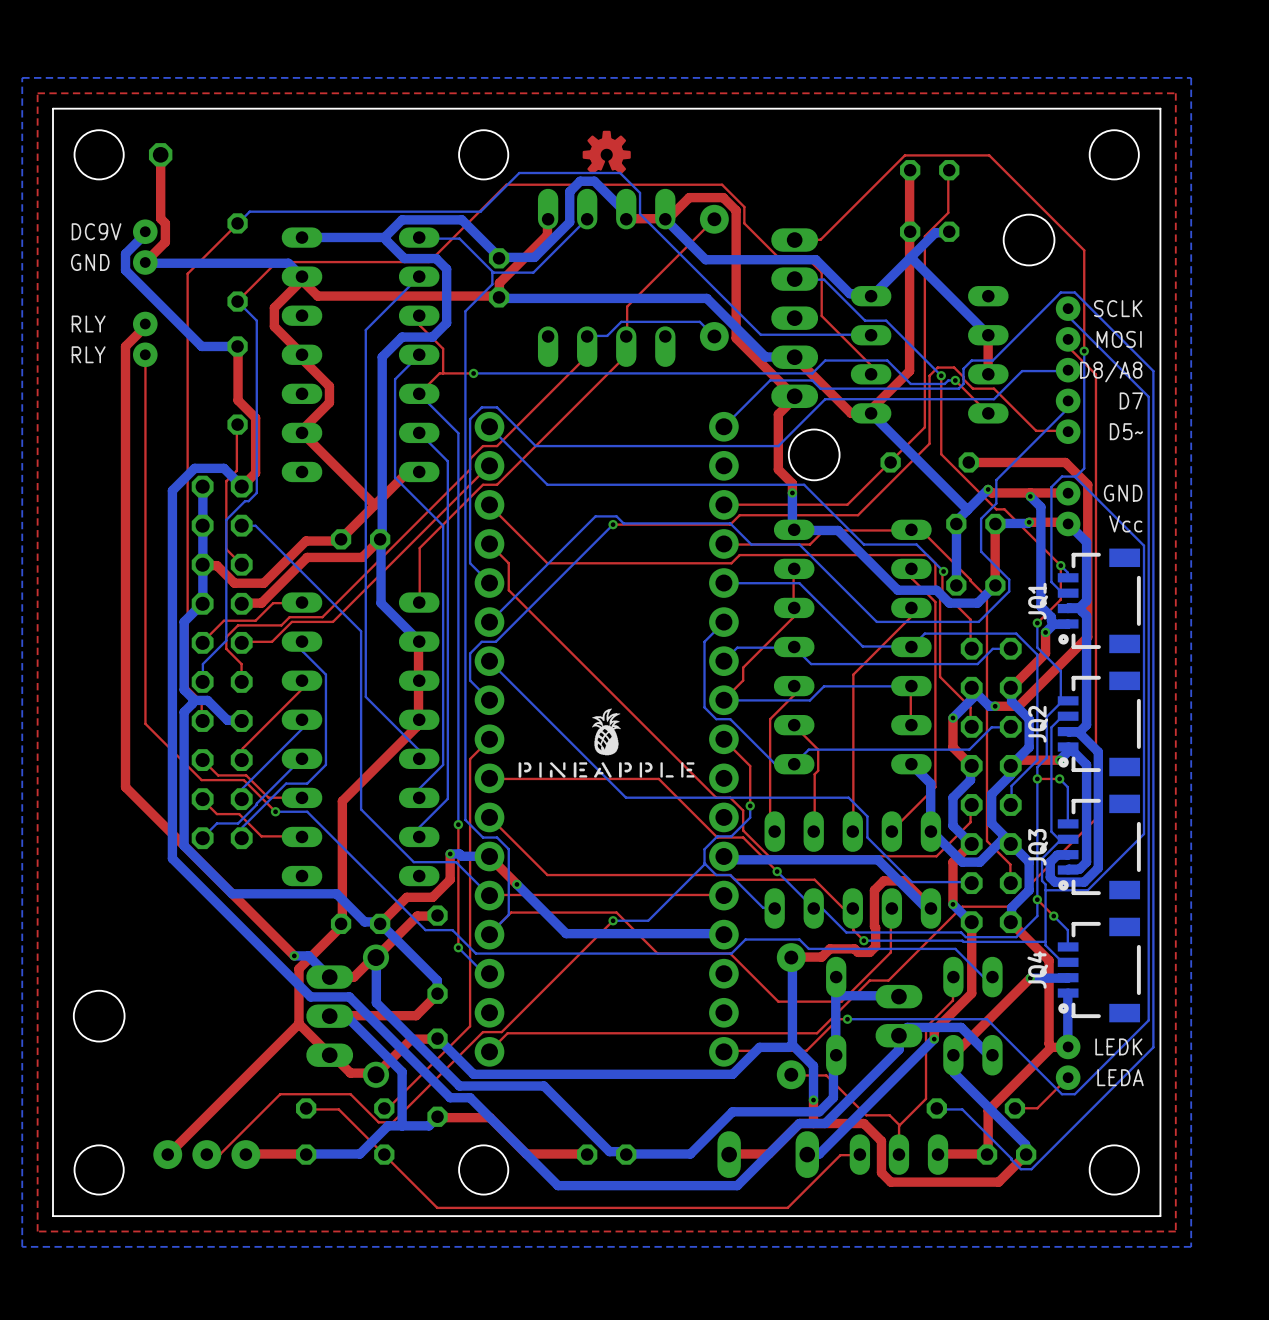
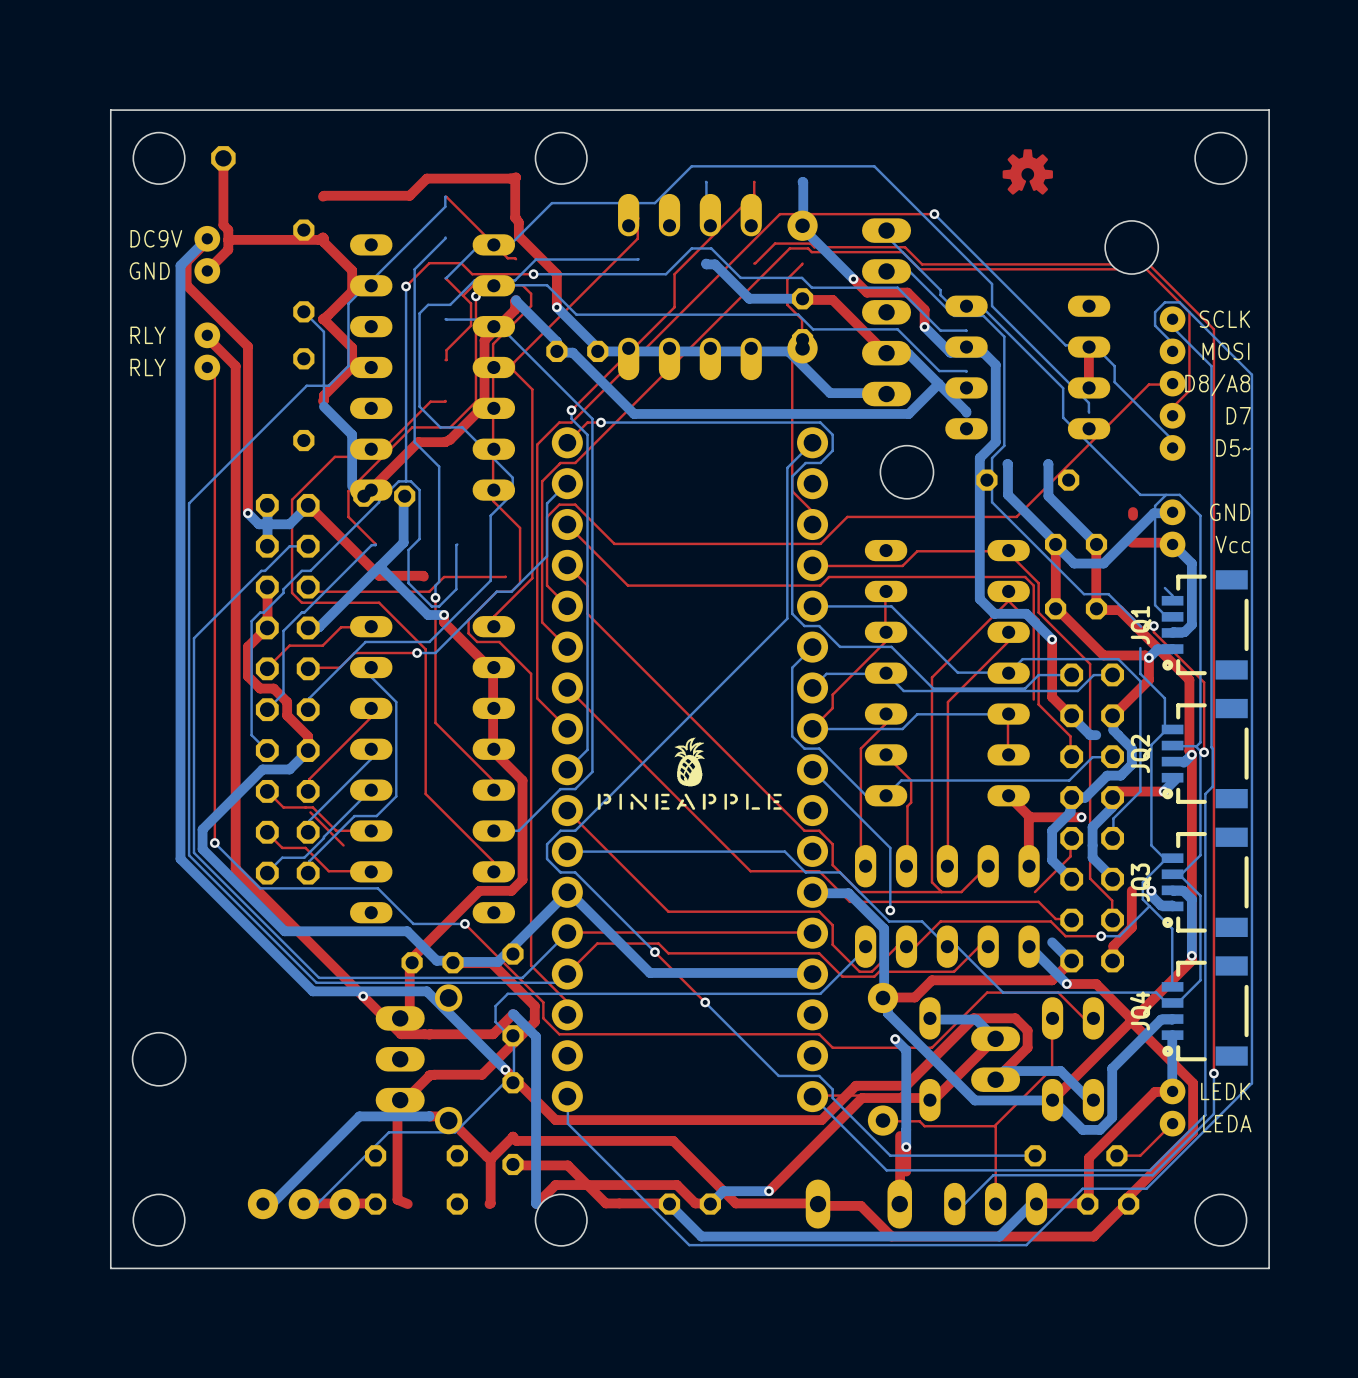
bottom zone outline: (1191, 77) (22, 77) (22, 1246) (1191, 1246) (1191, 77) -> none
top zone outline: (1175, 93) (37, 93) (37, 1231) (1175, 1231) (1175, 93) -> none
drawing position: (606, 152) -> (1027, 171)
top track: (910, 170) (909, 371) (872, 408) (871, 413) -> none
part: (929, 170) -> none
top track: (949, 170) (948, 212) (924, 236) (924, 427) (847, 504) (723, 504) -> (802, 263) (787, 279) (787, 304) (802, 319) (802, 339) (792, 350) (792, 491) (811, 510) (812, 524)
top track: none -> (754, 181) (754, 194) (674, 274) (674, 307) (571, 410)
bottom track: none -> (802, 181) (803, 228) (853, 279)
top track: none -> (322, 196) (409, 195) (426, 178) (516, 177) (515, 217) (518, 222) (518, 236) (556, 274) (556, 307)
top track: none -> (445, 196) (507, 258) (516, 259)
bottom track: none -> (445, 196) (445, 206) (348, 303) (348, 366) (328, 385) (306, 385) (189, 503) (189, 855) (316, 982) (558, 982) (567, 974)
top track: none -> (934, 214) (779, 214) (571, 422) (559, 422) (537, 444) (537, 698) (567, 728)
bottom track: none -> (934, 214) (1065, 345) (1093, 345) (1114, 366) (1114, 382) (1172, 439) (1172, 447)
via: none -> (934, 214)
bottom track: (622, 209) (594, 181) (580, 181) (569, 191) (569, 222) (534, 257) (499, 258) (461, 219) (402, 219) (384, 237) -> (706, 215) (706, 181)
top track: none -> (638, 218) (637, 238) (513, 362) (512, 370) (532, 389) (532, 578) (494, 616)
top track: (548, 219) (547, 235) (499, 283) (499, 297) (317, 296) (304, 283) (302, 276) (301, 280) (274, 307) (274, 326) -> (228, 239) (319, 239) (322, 237) (323, 242) (352, 270) (352, 291) (322, 319) (342, 337)
bottom track: (587, 219) (533, 272) (493, 272) (459, 238) (419, 237) -> none
top track: (626, 219) (665, 219) (689, 197) (723, 197) (736, 210) (736, 338) (794, 396) (778, 414) (778, 469) (792, 483) (792, 492) -> none
bottom track: (665, 219) (705, 259) (815, 259) (849, 293) (867, 293) (871, 296) (935, 232) (949, 231) -> none
top track: (714, 219) (627, 306) (625, 355) (497, 484) (481, 485) -> none
top track: (237, 223) (187, 273) (187, 687) (201, 701) (202, 720) -> none
bottom track: (237, 223) (249, 211) (480, 211) (519, 173) (620, 173) (640, 192) (640, 214) (760, 334) (871, 335) -> none
bottom track: none -> (886, 230) (886, 236) (940, 290) (940, 295) (956, 310) (985, 310) (1063, 388)
bottom track: none -> (445, 237) (414, 269) (414, 442) (439, 466) (439, 581) (435, 585) (435, 597)
top track: none -> (207, 238) (206, 242) (186, 261) (186, 285) (247, 346) (247, 513)
part: (929, 231) -> none
bottom track: (144, 232) (144, 235) (125, 253) (125, 270) (201, 346) (237, 346) -> (206, 239) (180, 265) (180, 858) (312, 991) (426, 991) (505, 1069)
bottom track: (384, 237) (302, 237) -> none
bottom track: (384, 237) (404, 258) (436, 258) (446, 269) (446, 323) (432, 337) (402, 337) (382, 357) (381, 603) (419, 641) -> none
top track: none -> (886, 247) (814, 247) (810, 243) (775, 243) (754, 263)
top track: (812, 239) (820, 239) (904, 155) (989, 155) (1084, 250) (1084, 301) -> (668, 369) (789, 248) (808, 248) (811, 252) (902, 252) (919, 269) (1146, 269) (1189, 312)
top track: none -> (905, 247) (922, 264) (1148, 264) (1213, 329) (1213, 1073)
bottom track: none -> (638, 259) (536, 259) (515, 280) (474, 280) (450, 304) (428, 304) (419, 313) (419, 406) (440, 427) (462, 427) (512, 477) (512, 493) (490, 515) (490, 580) (429, 641) (365, 641) (309, 698) (308, 709)
bottom track: none -> (706, 263) (715, 264) (749, 298) (802, 298)
bottom track: (910, 257) (988, 335) -> none
bottom track: (145, 262) (288, 263) (302, 276) -> none
bottom track: none -> (886, 271) (909, 271) (954, 315) (983, 315) (1004, 336) (1004, 445) (992, 458) (992, 502) (1084, 594) (1108, 594) (1141, 626)
top track: none -> (533, 274) (472, 274) (461, 263) (429, 263) (406, 286)
bottom track: none -> (533, 274) (665, 274) (691, 248) (711, 248) (740, 277) (802, 277) (811, 287) (897, 287) (940, 330) (966, 330)
via: none -> (533, 274)
top track: none -> (445, 278) (471, 303) (471, 325) (446, 350) (445, 360)
bottom track: none -> (445, 278) (479, 244) (510, 244) (551, 203) (654, 203) (691, 166) (874, 166) (992, 284) (992, 306) (1088, 402) (1089, 412)
top track: none -> (853, 279) (867, 292) (907, 292) (924, 309) (924, 326)
via: none -> (853, 279)
bottom track: (492, 272) (492, 284) (465, 311) (465, 819) (470, 824) -> (812, 442) (787, 467) (787, 618) (575, 830) (560, 830) (547, 844) (547, 858)
bottom track: (419, 276) (365, 330) (365, 696) (418, 749) (419, 758) -> none
bottom track: none -> (406, 286) (406, 481)
via: none -> (406, 286)
part rotation: 0° (499, 277) -> 90° clockwise (577, 351)
part position: (499, 277) -> (577, 351)
bottom track: (794, 279) (824, 279) (865, 320) (886, 320) (941, 375) -> none
top track: none -> (463, 295) (473, 285) (522, 285) (531, 293) (531, 306) (493, 344) (493, 501) (520, 527) (520, 583) (511, 591) (496, 591) (468, 619) (468, 633) (477, 641) (499, 641) (531, 673) (531, 965) (566, 1001) (567, 1014)
top track: none -> (475, 296) (475, 401) (450, 427) (412, 427) (348, 491) (348, 516) (375, 544)
bottom track: none -> (475, 296) (486, 285) (547, 285) (576, 314) (798, 314) (813, 329) (897, 329) (939, 371) (966, 371)
via: none -> (475, 296)
top track: none -> (802, 298) (832, 299) (886, 353)
top track: none -> (516, 300) (515, 309) (484, 340) (484, 405) (450, 439) (445, 442) (418, 442) (363, 496)
bottom track: none -> (516, 300) (556, 341) (556, 351) (572, 352) (634, 413) (908, 413) (938, 383)
bottom track: none -> (556, 307) (596, 346) (597, 351) (788, 351) (830, 393) (886, 394)
via: none -> (556, 307)
bottom track: (499, 297) (706, 298) (765, 357) (794, 357) -> none
top track: (237, 301) (276, 262) (429, 262) (506, 184) (722, 184) (744, 206) (744, 223) (777, 256) (805, 256) (821, 272) (821, 315) (870, 365) (871, 374) -> none
bottom track: (1051, 301) (992, 360) (971, 360) (963, 368) (963, 374) -> (1155, 312) (1155, 325) (1172, 342) (1172, 351)
part: none -> (802, 319)
top track: (419, 315) (419, 325) (443, 348) (443, 373) -> none
via: none -> (924, 326)
part position: (794, 318) -> (886, 312)
top track: (145, 324) (144, 327) (125, 346) (125, 787) (172, 834) -> (207, 335) (207, 337) (235, 366) (235, 868)
top track: (283, 335) (302, 354) (302, 359) (329, 386) (329, 402) (303, 428) (302, 432) (374, 505) -> (352, 347) (352, 367) (323, 395) (322, 400)
bottom track: (714, 336) (699, 321) (621, 321) (607, 335) (587, 336) -> none
top track: (1068, 339) (1069, 347) (1095, 374) (1095, 818) (1008, 906) (962, 906) (888, 980) (869, 980) (817, 1033) (507, 1033) (489, 1051) -> none
bottom track: none -> (886, 353) (908, 353) (966, 412)
top track: (237, 346) (238, 400) (255, 417) (255, 473) (241, 486) -> (423, 576) (379, 575) (308, 505)
top track: none -> (1189, 363) (1189, 390) (1173, 406) (1172, 415)
bottom track: (1084, 351) (1084, 468) (1075, 477) -> none
via: (1084, 351) -> none
bottom track: (1105, 353) (1148, 396) (1148, 1020) (1099, 1069) -> (1211, 366) (1212, 786) (1205, 793) (1205, 1115)
bottom track: (419, 354) (395, 379) (395, 477) (443, 525) (443, 764) (419, 788) (419, 797) -> (445, 319) (493, 319) (592, 418) (592, 771) (575, 789) (560, 789) (518, 830) (494, 830)
top track: (145, 355) (145, 723) (201, 780) (243, 780) -> (207, 368) (214, 375) (214, 843)
top track: (794, 357) (851, 413) (870, 413) -> none
bottom track: (1144, 361) (1153, 371) (1153, 1047) (1031, 1169) (1020, 1169) (962, 1109) (936, 1108) -> (705, 1002) (778, 1075) (819, 1075) (832, 1089) (832, 1098) (890, 1155) (1034, 1155)
bottom track: (1068, 370) (1022, 371) (994, 399) (825, 399) (778, 446) (731, 446) -> (600, 422) (820, 422) (832, 434) (832, 450) (820, 463)
top track: (473, 373) (439, 373) (419, 393) -> none
bottom track: (473, 373) (812, 373) (825, 360) (887, 360) (910, 383) (944, 383) (948, 380) (955, 380) -> none
via: (473, 373) -> none
top track: (941, 375) (941, 454) (996, 509) (1004, 509) (1060, 565) (1060, 599) (1037, 623) -> none
via: (941, 375) -> none
top track: (955, 380) (988, 413) -> none
via: (955, 380) -> none
bottom track: (963, 383) (958, 388) (820, 388) (812, 380) (770, 380) (723, 426) -> (1063, 398) (1063, 417) (1140, 494) (1166, 494)
bottom track: (256, 392) (256, 492) (248, 501) (245, 501) (226, 519) (226, 640) (202, 664) (202, 681) -> (375, 544) (371, 545) (283, 630) (283, 693) (267, 709)
bottom track: none -> (323, 406) (352, 434) (352, 486)
bottom track: (419, 393) (458, 433) (458, 824) -> none
bottom track: none -> (571, 410) (571, 418) (575, 422)
via: none -> (571, 410)
bottom track: (1068, 400) (1067, 408) (996, 480) (996, 503) (981, 518) (981, 551) (1009, 579) (1009, 591) (978, 621) (876, 621) (799, 544) (751, 544) (730, 523) (623, 523) (616, 516) (595, 516) (489, 622) -> none
bottom track: (497, 407) (481, 407) (470, 419) (470, 484) -> (567, 483) (547, 503)
top track: none -> (600, 422) (587, 422) (567, 442)
via: none -> (600, 422)
bottom track: (871, 413) (967, 509) -> none
bottom track: (508, 419) (535, 446) (717, 446) -> (587, 434) (587, 749) (567, 769)
top track: (237, 424) (236, 470) -> (445, 400) (430, 401) (375, 456) (334, 456) (303, 488)
bottom track: (489, 426) (547, 484) (804, 484) (863, 544) (916, 544) (943, 571) -> none
top track: (1068, 431) (1036, 430) (994, 388) (972, 388) (954, 367) (937, 367) (929, 375) (929, 443) (858, 515) (739, 515) -> (1172, 383) (1148, 384) (1016, 516) (847, 516) (829, 535)
bottom track: (419, 432) (447, 461) (447, 798) (419, 826) (419, 836) -> none
bottom track: none -> (805, 463) (792, 476) (792, 613) (804, 626) (819, 626) (840, 646) (891, 646) (933, 688) (1025, 688) (1038, 675) (1071, 674)
top track: (470, 458) (470, 469) (322, 617) (289, 617) (281, 625) (238, 625) (226, 637) (226, 648) (241, 664) (241, 681) -> (547, 476) (542, 481) (542, 622) (567, 647)
top track: (968, 462) (1065, 462) (1087, 484) (1087, 637) (1018, 706) (995, 706) -> none
top track: (489, 465) (332, 621) (291, 621) (286, 627) -> (417, 653) (354, 653)
top track: (419, 471) (406, 473) (341, 539) (306, 541) (263, 583) (234, 583) (216, 565) (202, 565) -> (308, 750) (308, 736) (287, 715) (287, 702) (273, 688) (260, 688) (247, 676) (247, 646) (267, 627) (267, 588)
bottom track: none -> (404, 496) (403, 542) (319, 627) (308, 627)
bottom track: (241, 486) (223, 468) (194, 468) (172, 490) (172, 858) -> (308, 546) (289, 546) (265, 570) (261, 570) (193, 638) (193, 852) (235, 894)
bottom track: none -> (308, 505) (289, 524) (258, 524) (247, 513)
top track: (988, 489) (991, 492) (1068, 493) -> none
bottom track: (988, 489) (957, 519) (956, 523) -> (1007, 464) (1007, 494) (1055, 544)
via: (988, 489) -> none
bottom track: (792, 492) (792, 525) (794, 530) (838, 530) (883, 576) -> (924, 326) (950, 352) (983, 352) (995, 364) (995, 442) (979, 458) (979, 599)
via: (792, 492) -> none
via: none -> (247, 513)
bottom track: (1030, 496) (1040, 507) (1040, 606) (1051, 617) (1053, 624) -> none
via: (1030, 496) -> none
bottom track: (1094, 496) (1144, 545) -> (1251, 374) (1251, 567)
bottom track: none -> (1200, 515) (1200, 742) (1196, 746)
top track: (470, 497) (419, 548) (419, 592) -> (547, 516) (547, 585) (567, 606)
bottom track: (1029, 522) (995, 523) -> (1048, 464) (1048, 496) (1096, 544)
via: (1029, 522) -> none
bottom track: none -> (457, 544) (456, 589) (439, 606) (431, 606) (408, 583) (408, 550) (419, 539) (419, 489) (410, 481) (398, 481) (310, 570) (301, 570) (283, 589) (283, 592) (263, 612) (260, 612) (251, 621) (251, 735) (267, 750)
top track: (731, 523) (613, 524) -> (820, 543) (614, 543) (575, 504) (559, 504)
top track: none -> (1055, 544) (1055, 608) (1103, 655) (1145, 655) (1148, 657)
bottom track: (613, 524) (495, 641) (481, 641) (470, 653) (470, 680) (489, 700) -> none
via: (613, 524) -> none
bottom track: (956, 524) (956, 585) -> (1055, 545) (1074, 563) (1103, 563) (1153, 513) (1172, 512)
bottom track: (202, 525) (202, 603) (184, 621) (184, 689) (194, 700) -> none
bottom track: (241, 525) (255, 525) (361, 631) (361, 809) (413, 862) (456, 862) (489, 895) -> none
top track: (911, 529) (921, 530) (986, 597) (986, 841) (989, 843) -> (1070, 644) (1090, 664) (1090, 878)
bottom track: (470, 535) (470, 563) (489, 583) -> (547, 556) (511, 591) (496, 591) (435, 653) (417, 653)
part position: (360, 539) -> (384, 496)
top track: (380, 539) (362, 557) (307, 557) (261, 603) (241, 603) -> none
bottom track: none -> (379, 566) (428, 615) (444, 615)
top track: (226, 549) (241, 564) -> (505, 576) (444, 577) (429, 591) (312, 591) (308, 587)
top track: none -> (292, 570) (292, 592) (301, 602) (379, 602) (425, 649) (425, 793) (493, 861) (493, 871)
via: (1060, 565) -> none
top track: none -> (1008, 591) (1007, 601) (931, 677) (931, 882) (941, 892)
top track: (943, 571) (942, 591) -> (1008, 550) (1007, 552) (1038, 583) (1038, 612) (1041, 615)
via: (943, 571) -> none
top track: none -> (435, 597) (435, 722) (493, 780) (493, 790)
via: none -> (435, 597)
top track: none -> (1096, 608) (1119, 610) (1189, 679) (1189, 751) (1191, 754) (1191, 960) (1133, 1019)
bottom track: (995, 585) (977, 603) (949, 603) (936, 590) (928, 590) -> (1052, 639) (1026, 613)
top track: none -> (444, 615) (444, 622) (488, 666) (493, 667)
via: none -> (444, 615)
top track: none -> (1153, 626) (1153, 632) (1204, 682) (1204, 752)
via: none -> (1153, 626)
bottom track: (1079, 607) (1086, 616) (1086, 725) -> none
top track: none -> (1052, 639) (1052, 697) (1071, 715)
via: none -> (1052, 639)
top track: (970, 619) (971, 648) -> none
via: (1037, 623) -> none
via: none -> (417, 653)
top track: none -> (567, 687) (750, 871) (819, 871) (849, 901) (1038, 901) (1055, 919) (1071, 920)
bottom track: (489, 661) (625, 797) (848, 797) (867, 816) (867, 837) (911, 882) (971, 883) -> none
top track: (935, 672) (935, 787) (891, 831) -> none
bottom track: (971, 687) (974, 696) (952, 718) -> none
bottom track: (194, 700) (184, 712) (184, 845) (232, 893) -> (308, 750) (289, 769) (262, 769) (202, 829) (202, 849) (284, 931) (298, 931)
bottom track: (194, 700) (207, 700) (227, 720) (241, 720) -> none
via: (995, 706) -> none
bottom track: (1047, 715) (1046, 757) (1037, 767) (1037, 916) (1016, 937) (965, 937) (961, 932) (846, 932) (822, 909) (813, 908) (777, 871) -> none
bottom track: (1068, 716) (1061, 716) (1051, 727) (1051, 831) (1059, 839) (1068, 839) (1060, 839) (1042, 858) (1042, 880) (1045, 884) (1045, 945) (1052, 952) -> (1172, 745) (1195, 746) (1200, 751) (1200, 855) (1180, 874) (1172, 874) (1179, 874) (1200, 895) (1200, 980) (1178, 1002) (1172, 1002)
top track: (952, 718) (952, 747) (971, 765) -> none
via: (952, 718) -> none
top track: (419, 719) (417, 726) (342, 801) (342, 919) (340, 927) (298, 968) (298, 1023) -> (493, 749) (495, 753) (522, 780) (522, 879) (511, 890) (479, 890) (412, 958) (409, 966) (409, 1013)
via: none -> (1204, 752)
via: none -> (1191, 754)
bottom track: (1068, 731) (1078, 732) (1098, 751) (1098, 868) (1084, 882) (1054, 882) (1050, 877) (1050, 862) (1057, 855) (1068, 854) -> (1191, 955) (1191, 899) (1183, 890) (1172, 890)
bottom track: (1029, 734) (1029, 747) (1010, 765) -> (1131, 764) (1120, 775) (1107, 775) (1085, 797) (1071, 797)
top track: (489, 739) (470, 759) (470, 1026) (388, 1108) (384, 1108) -> none
top track: (723, 739) (750, 766) (750, 805) -> none
bottom track: none -> (812, 769) (890, 847) (890, 910)
bottom track: (1068, 746) (1086, 764) (1086, 862) (1079, 869) (1068, 870) -> (1151, 890) (1151, 895) (1161, 905) (1172, 906)
top track: none -> (1008, 795) (1028, 816) (1029, 866)
bottom track: (911, 764) (930, 783) (930, 831) (962, 862) (979, 862) (1002, 839) (1011, 844) (1029, 862) (1029, 890) (1011, 907) (1010, 922) -> none
top track: (490, 778) (658, 778) (717, 837) (743, 837) (777, 871) -> none
via: (1037, 778) -> none
top track: (1059, 778) (1037, 778) -> none
bottom track: (1059, 778) (1067, 787) (1068, 823) -> none
via: (1059, 778) -> none
top track: none -> (1081, 817) (1028, 817)
via: none -> (1081, 817)
bottom track: (750, 805) (750, 817) (731, 836) (717, 836) (704, 849) (704, 863) (716, 875) (730, 875) (763, 907) (774, 908) -> (835, 979) (865, 946)
via: (750, 805) -> none
bottom track: none -> (214, 843) (260, 888) (377, 888) (413, 923) (464, 923)
via: none -> (214, 843)
bottom track: (275, 811) (307, 811) (425, 930) (452, 930) (475, 953) -> (303, 1204) (317, 1203) (388, 1132) (455, 1132) (513, 1073) (513, 1040) (495, 1022) (495, 1006) (507, 993) (553, 993)
via: (275, 811) -> none
top track: (489, 817) (547, 875) (586, 875) -> (567, 811) (668, 911)
bottom track: none -> (567, 851) (784, 851) (805, 872) (840, 872) (889, 921) (922, 921) (947, 947) (957, 947) (1003, 992) (1156, 992)
top track: (458, 824) (458, 947) -> none
via: (458, 824) -> none
bottom track: (1144, 834) (1087, 890) (1045, 890) -> (1251, 868) (1251, 1083) (1146, 1188) (1082, 1188) (1026, 1245) (689, 1245) (567, 1123) (567, 1096)
top track: (971, 844) (952, 862) (952, 904) -> none
bottom track: (508, 849) (508, 914) (489, 934) -> (587, 884) (654, 952)
top track: (450, 853) (450, 879) (432, 897) (406, 897) (380, 923) -> (407, 1204) (397, 1199) (397, 1107) (429, 1075) (482, 1074) (534, 1022) (534, 1006) (491, 963) (452, 962)
bottom track: (450, 853) (459, 853) (461, 856) (489, 856) -> none
via: (450, 853) -> none
via: none -> (1151, 890)
top track: (489, 856) (516, 884) -> none
top track: (936, 856) (866, 856) -> (988, 866) (961, 892)
bottom track: (724, 857) (726, 859) (877, 859) (926, 907) (930, 908) -> (813, 893) (848, 893) (884, 928) (883, 997) (887, 1001) (887, 1013) (974, 1100) (1052, 1100)
bottom track width: thick (172, 858) (252, 938) -> thin (235, 894) (319, 977)
bottom track: (705, 863) (648, 920) (613, 920) -> none
bottom track: none -> (1149, 906) (1119, 936) (1101, 936)
via position: (777, 871) -> (890, 910)
top track: (734, 879) (814, 879) (842, 907) (853, 909) (853, 930) (863, 940) -> (824, 916) (832, 925) (832, 944) (859, 971) (871, 971) (896, 947) (916, 946) (940, 921) (1050, 921) (1065, 936) (1101, 936)
bottom track: (516, 884) (566, 933) (568, 933) -> (452, 962) (498, 961) (567, 892) (650, 972)
via: (516, 884) -> none
top track: none -> (464, 923) (543, 1002) (543, 1018) (559, 1034) (819, 1034) (832, 1047) (931, 1047) (935, 1044)
via: none -> (464, 923)
via: none -> (1101, 936)
top track: (1037, 899) (1053, 916) -> none
via: (1037, 899) -> none
via: (952, 904) -> none
top track: (930, 908) (903, 880) (883, 880) (874, 890) (875, 946) (869, 952) (858, 952) (854, 948) (829, 948) -> (1071, 960) (1052, 980) (931, 980) (923, 988)
bottom track: none -> (1029, 946) (1066, 984)
top track: (890, 909) (890, 952) -> (1093, 1018) (1084, 1018) (1058, 992) (987, 992)
top track: (511, 912) (616, 912) (657, 953) (730, 953) (778, 1001) (841, 1001) -> (589, 950) (597, 943) (658, 943) (668, 953) (819, 953) (842, 976) (874, 976) (879, 971) (954, 971) (978, 947) (987, 947)
top track: none -> (654, 952) (705, 1002)
via: none -> (654, 952)
top track: (437, 915) (417, 916) (354, 977) (329, 977) -> none
bottom track: (1053, 916) (1067, 930) -> (1151, 744) (1151, 845) (1164, 858) (1172, 858) (1166, 858) (1142, 882) (1142, 899) (1172, 928) (1172, 969)
via: (1053, 916) -> none
via: none -> (1191, 955)
top track: (613, 920) (501, 1032) (482, 1032) (392, 1122) (378, 1122) (350, 1094) (280, 1094) (220, 1153) (206, 1154) -> none
via: (613, 920) -> none
top track: (971, 922) (971, 993) (934, 1030) (934, 1039) -> none
top track: (1010, 922) (1049, 960) (1049, 1043) (1051, 1047) -> (1112, 960) (1113, 946) (1131, 927) (1131, 890)
bottom track: (380, 923) (437, 980) (437, 993) -> none
bottom track: (252, 938) (310, 996) (349, 996) (450, 1097) (470, 1097) (558, 1185) (617, 1185) -> (319, 977) (522, 977) (567, 933)
bottom track: (745, 939) (799, 939) (808, 948) (955, 948) (983, 977) (992, 977) -> none
bottom track: (863, 940) (1045, 941) -> none
via: (863, 940) -> none
top track: none -> (1066, 984) (1096, 984) (1132, 1020)
via: none -> (1066, 984)
bottom track: (458, 947) (484, 973) (489, 973) -> none
via: (458, 947) -> none
top track: none -> (363, 996) (401, 1034) (493, 1034) (512, 1014)
bottom track: (294, 955) (308, 955) (329, 977) -> none
bottom track: (376, 957) (376, 1002) (459, 1086) (543, 1086) (609, 1151) (622, 1151) (626, 1154) -> none
bottom track: (791, 957) (792, 1044) -> none
via: none -> (705, 1002)
bottom track: none -> (512, 1014) (536, 1036) (536, 1204)
bottom track: none -> (929, 1018) (976, 1019) (994, 1037)
via: (1030, 978) -> none
bottom track: (1057, 978) (1030, 978) -> (1161, 1019) (1112, 1068) (1112, 1117) (1099, 1129) (1082, 1129) (1053, 1100)
top track: none -> (1131, 1021) (1193, 1083) (1193, 1132) (1129, 1196) (1129, 1203) (1124, 1205) (1093, 1236) (891, 1236) (860, 1205) (822, 1205) (817, 1203) (735, 1203) (673, 1140) (516, 1140) (512, 1136) (490, 1159)
top track: (437, 993) (416, 1015) (329, 1016) -> none
bottom track: (897, 995) (839, 995) (836, 977) (836, 1055) (833, 1059) (833, 1097) (819, 1111) (732, 1111) (690, 1153) (627, 1153) -> (768, 1191) (723, 1191) (711, 1203)
via: none -> (895, 1039)
top track: none -> (995, 1038) (934, 1099) (862, 1098) (768, 1191)
top track: (952, 1000) (926, 1027) (926, 1098) (899, 1125) -> (1052, 1042) (1052, 1068) (995, 1124) (995, 1174)
bottom track: (329, 1016) (347, 1016) (402, 1071) (402, 1125) -> none
bottom track: (847, 1019) (986, 1019) (1061, 1094) (1074, 1094) -> (812, 1096) (886, 1170) (1150, 1170) (1179, 1140)
via: (847, 1019) -> none
top track: (298, 1023) (350, 1073) (376, 1074) (411, 1039) (437, 1038) -> none
top track: (298, 1023) (167, 1154) -> none
top track: none -> (505, 1069) (555, 1120) (821, 1120) (855, 1085) (906, 1085) (973, 1018) (1015, 1018) (1027, 1030) (1027, 1047) (995, 1079)
via: none -> (505, 1069)
bottom track: none -> (1213, 1073) (1213, 1113) (1152, 1175) (993, 1175) (965, 1203) (954, 1204)
via: none -> (1213, 1073)
bottom track: (898, 1035) (899, 1049) (825, 1123) (799, 1123) (737, 1185) -> (1036, 1204) (1031, 1204) (999, 1236) (826, 1236)
bottom track: (437, 1038) (473, 1074) (732, 1074) (759, 1047) (788, 1047) (792, 1044) -> none
bottom track: (934, 1039) (819, 1153) (807, 1154) -> none
via: (934, 1039) -> none
bottom track: (792, 1044) (813, 1066) -> (895, 1039) (906, 1050) (906, 1111)
bottom track: (954, 1055) (954, 1073) (1025, 1144) (1026, 1154) -> none
top track: none -> (429, 1116) (446, 1116) (490, 1159)
bottom track: none -> (429, 1116) (359, 1116) (272, 1203) (262, 1204)
top track: (831, 1080) (866, 1115) (889, 1115) (899, 1125) -> (924, 1126) (995, 1126)
top track: none -> (900, 1136) (899, 1204)
top track: (306, 1108) (338, 1109) (437, 1207) (787, 1207) (840, 1155) (859, 1154) -> none
top track: none -> (490, 1159) (489, 1204)
bottom track: (437, 1116) (429, 1125) (388, 1125) (359, 1153) (306, 1154) -> none
via: none -> (768, 1191)
part position: (206, 1154) -> (303, 1204)
bottom track: none -> (669, 1204) (701, 1236)
top track: none -> (710, 1204) (695, 1203) (677, 1185) (555, 1185) (536, 1204)
top track: (1026, 1154) (998, 1182) (890, 1182) (881, 1172) (881, 1141) (863, 1123) (799, 1123) (768, 1153) (729, 1154) -> none

